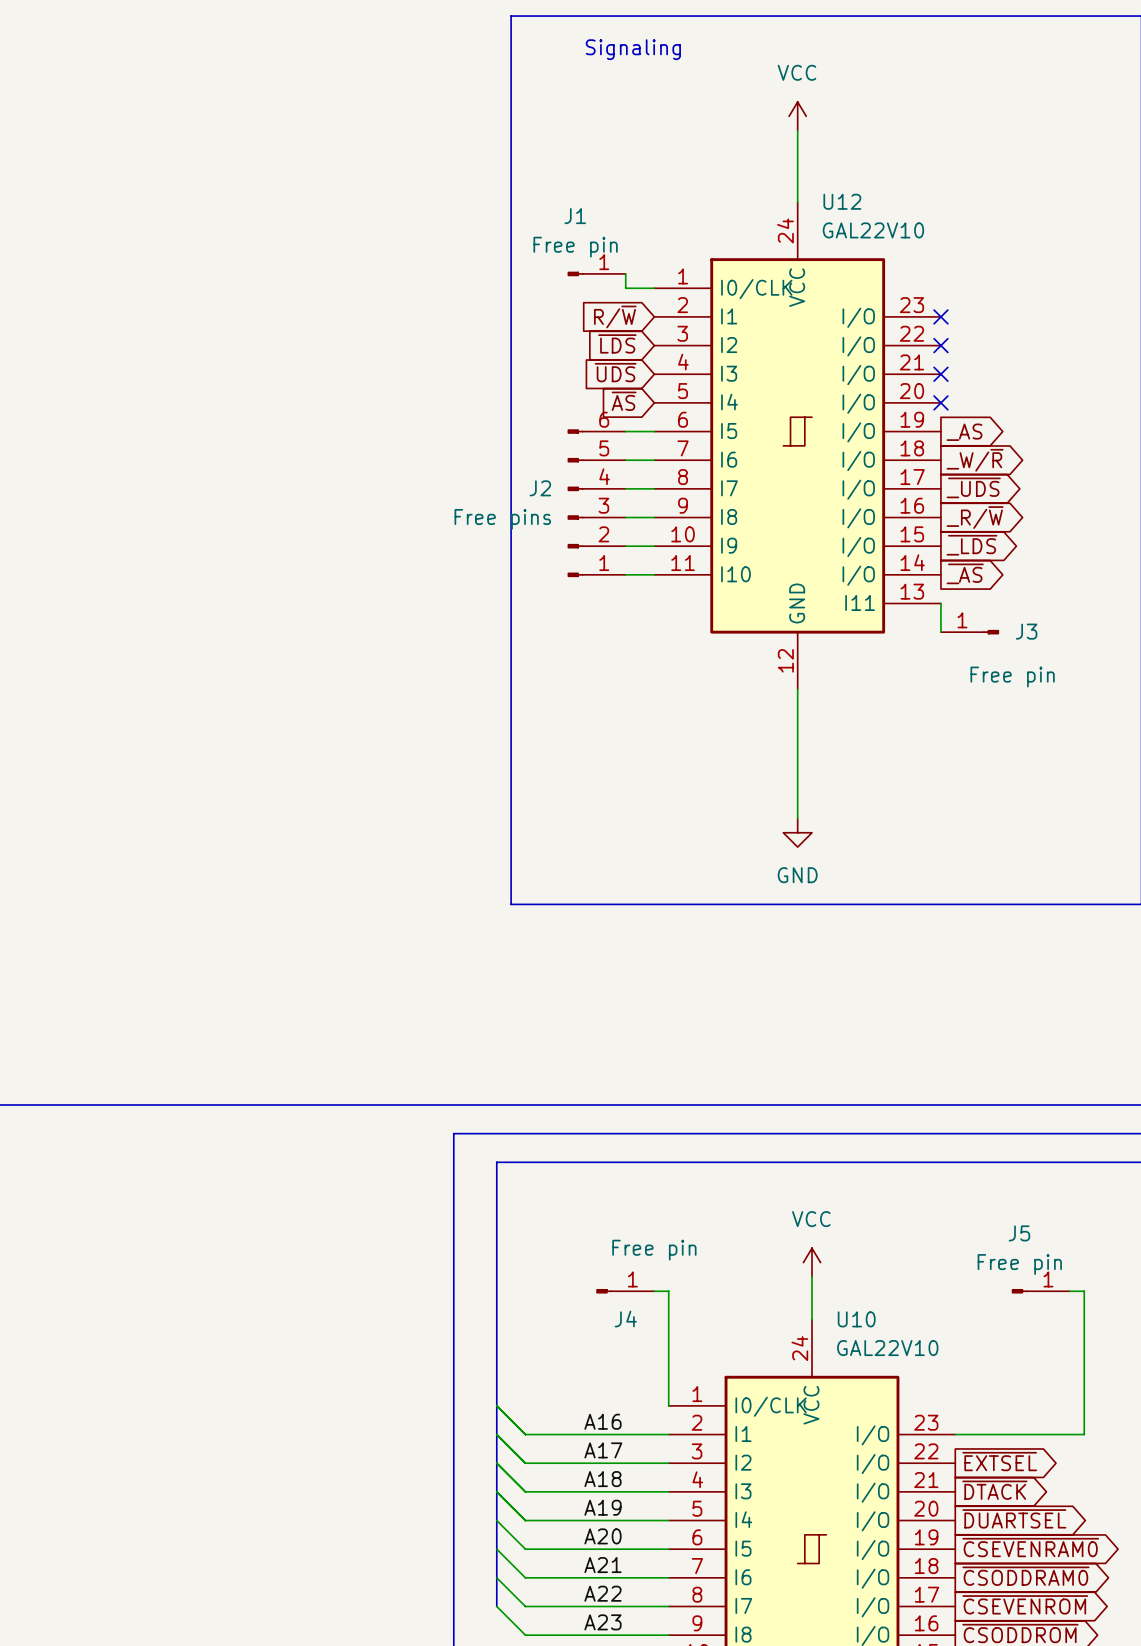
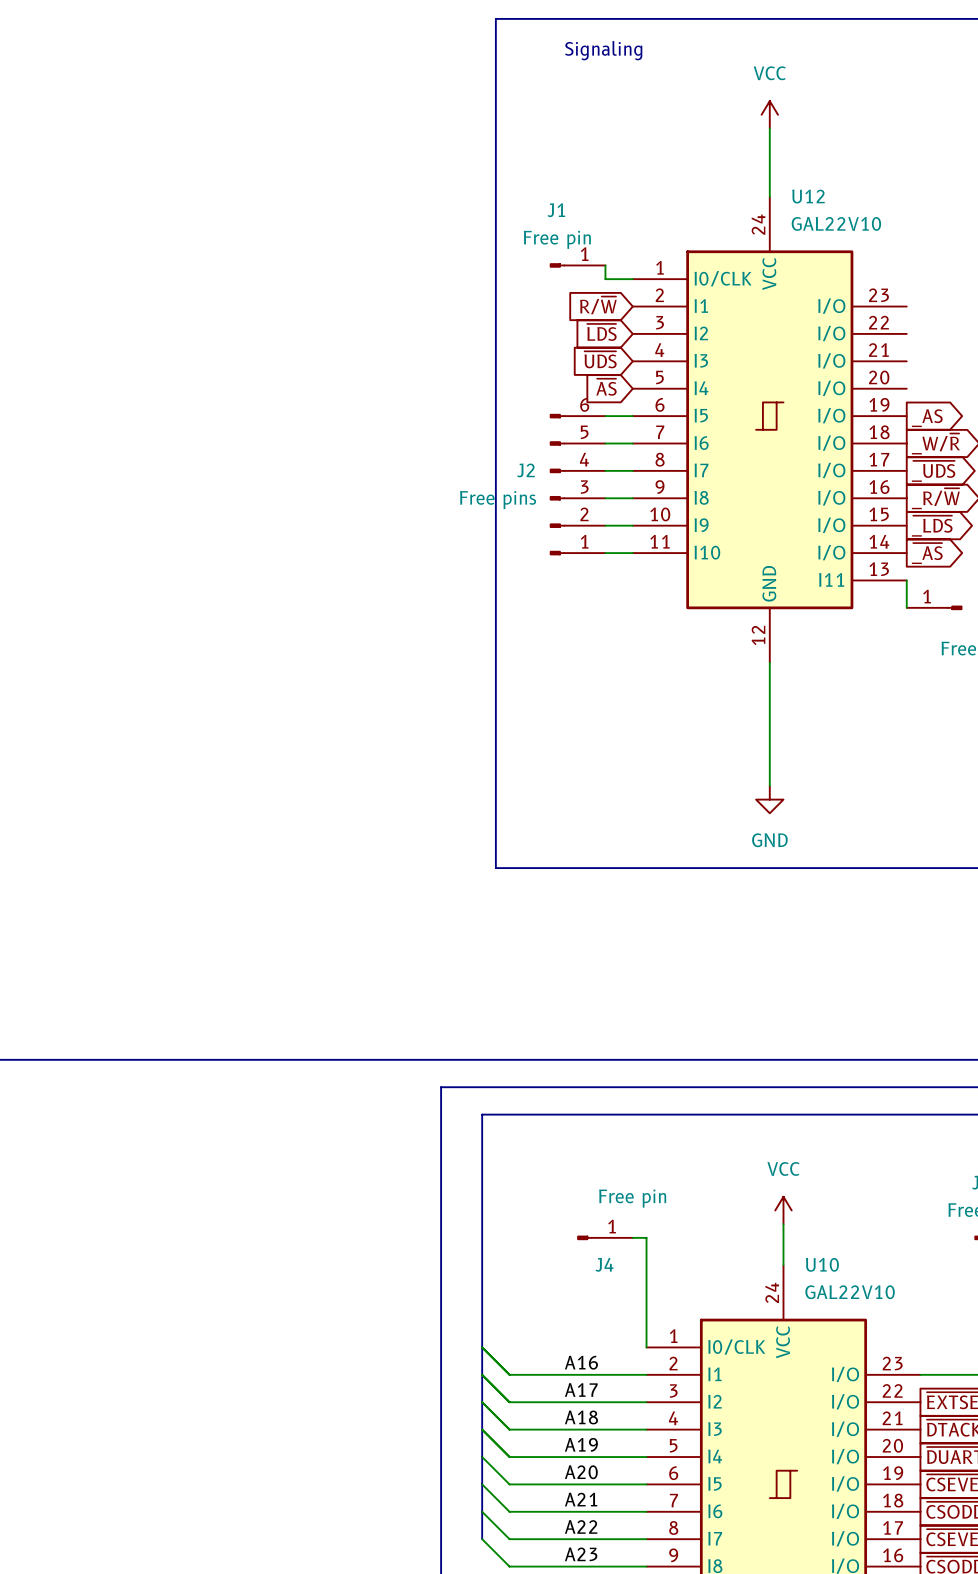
no-connect mark: (940, 316) -> none
no-connect mark: (940, 345) -> none
no-connect mark: (940, 374) -> none
no-connect mark: (940, 402) -> none

